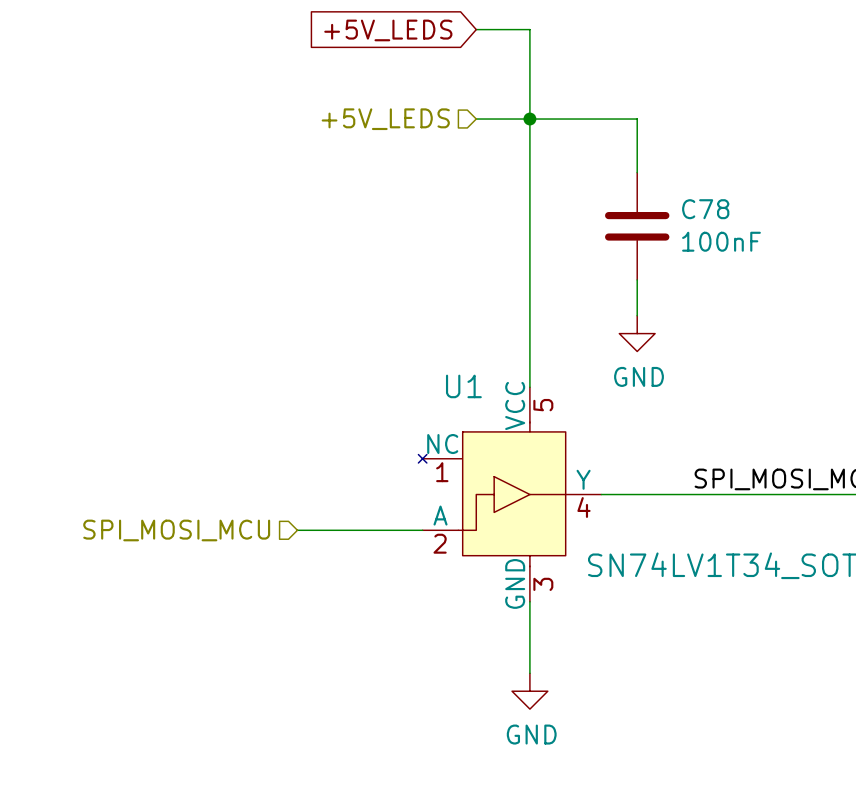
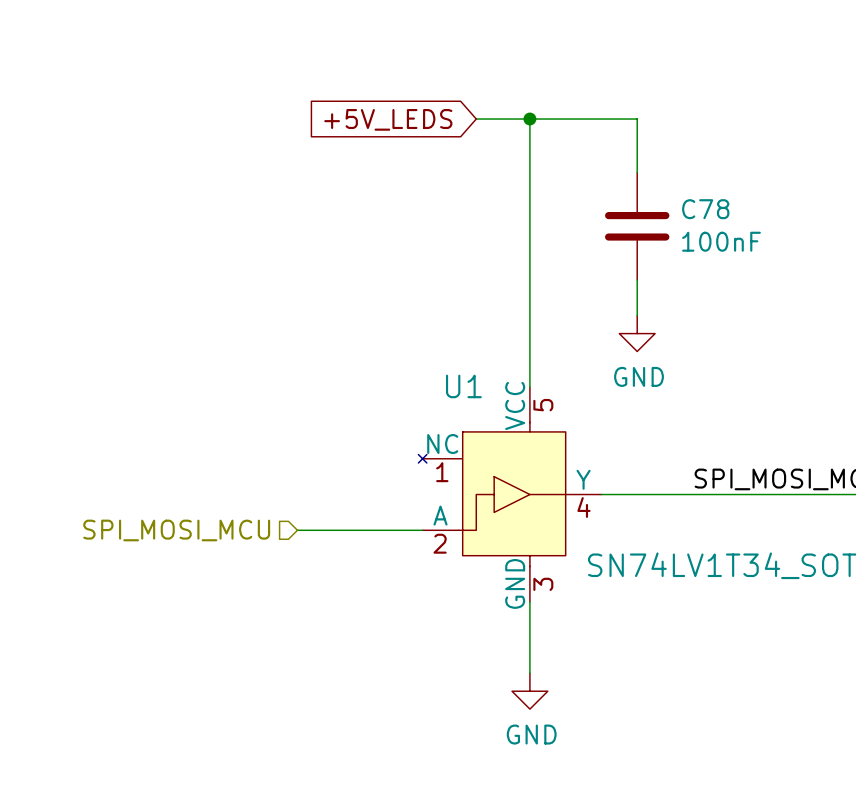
wire: (476, 29) (529, 29) (529, 119) -> none
global label position: +5V_LEDS (388, 30) -> +5V_LEDS (388, 119)
hierarchical label: +5V_LEDS (385, 119) -> none

